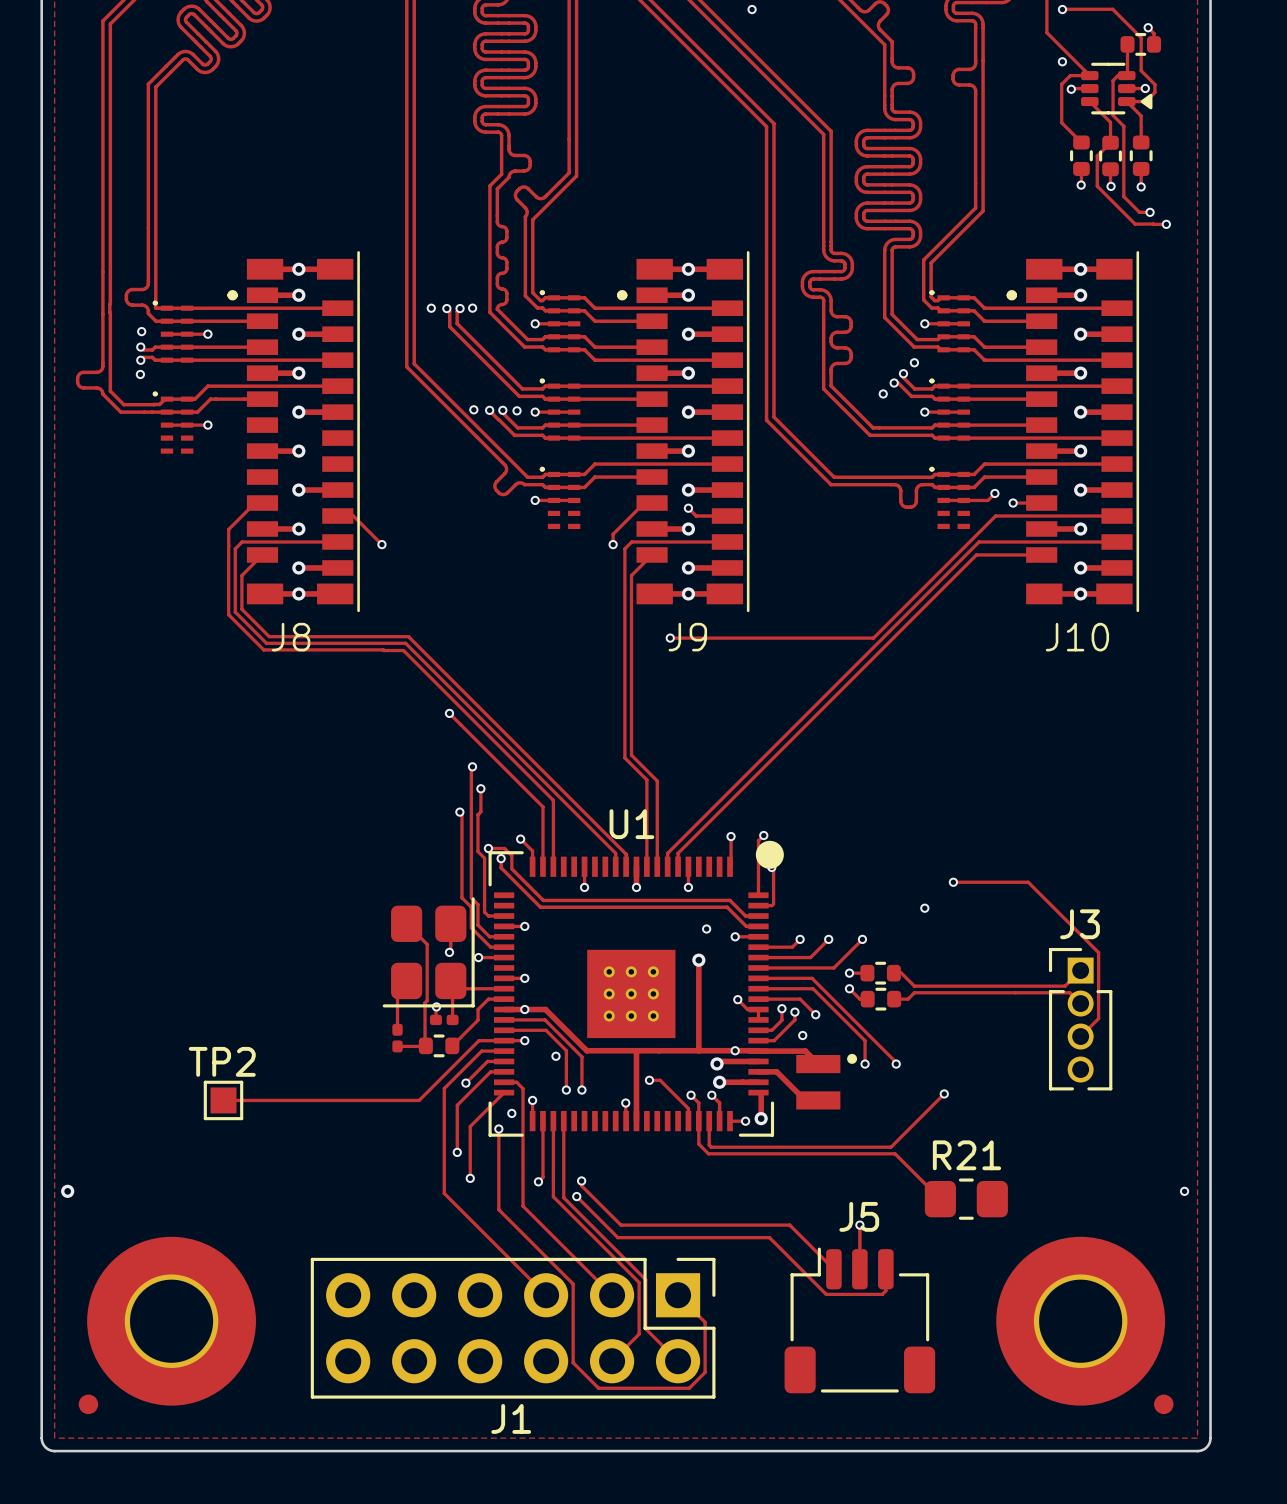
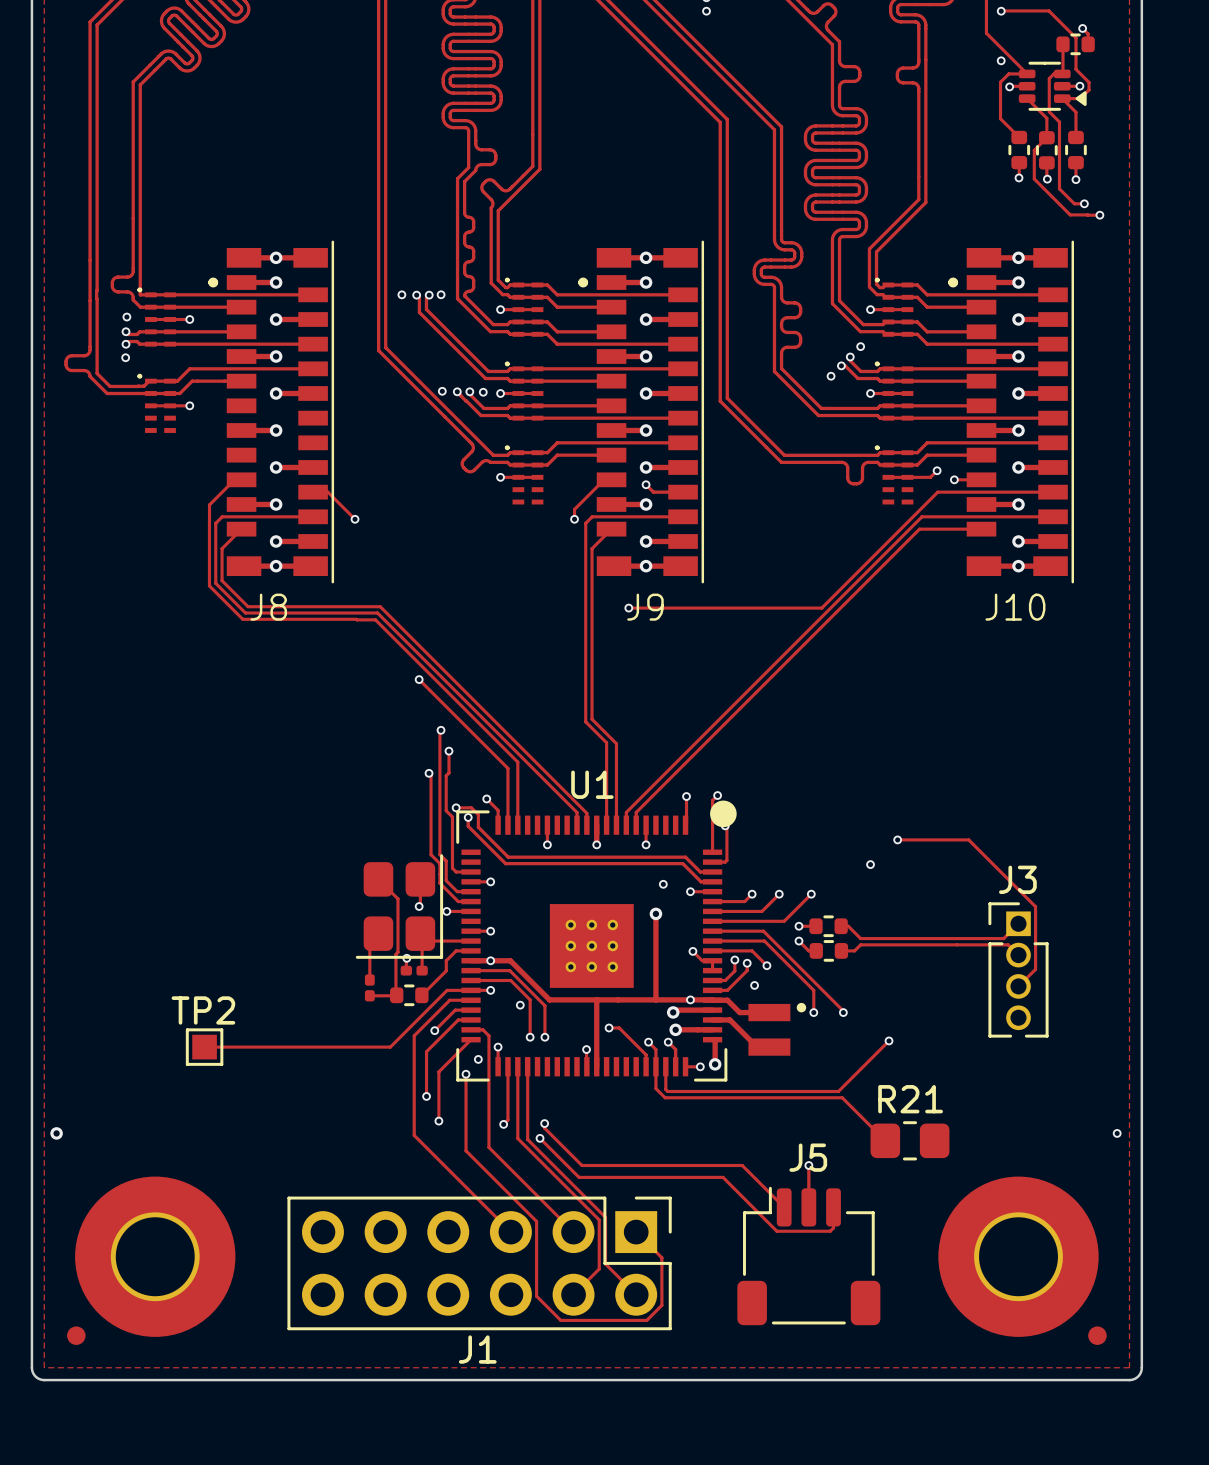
track: (774, 1051) (805, 1051) (818, 1064) -> (727, 1000) (739, 1012) (769, 1012)

